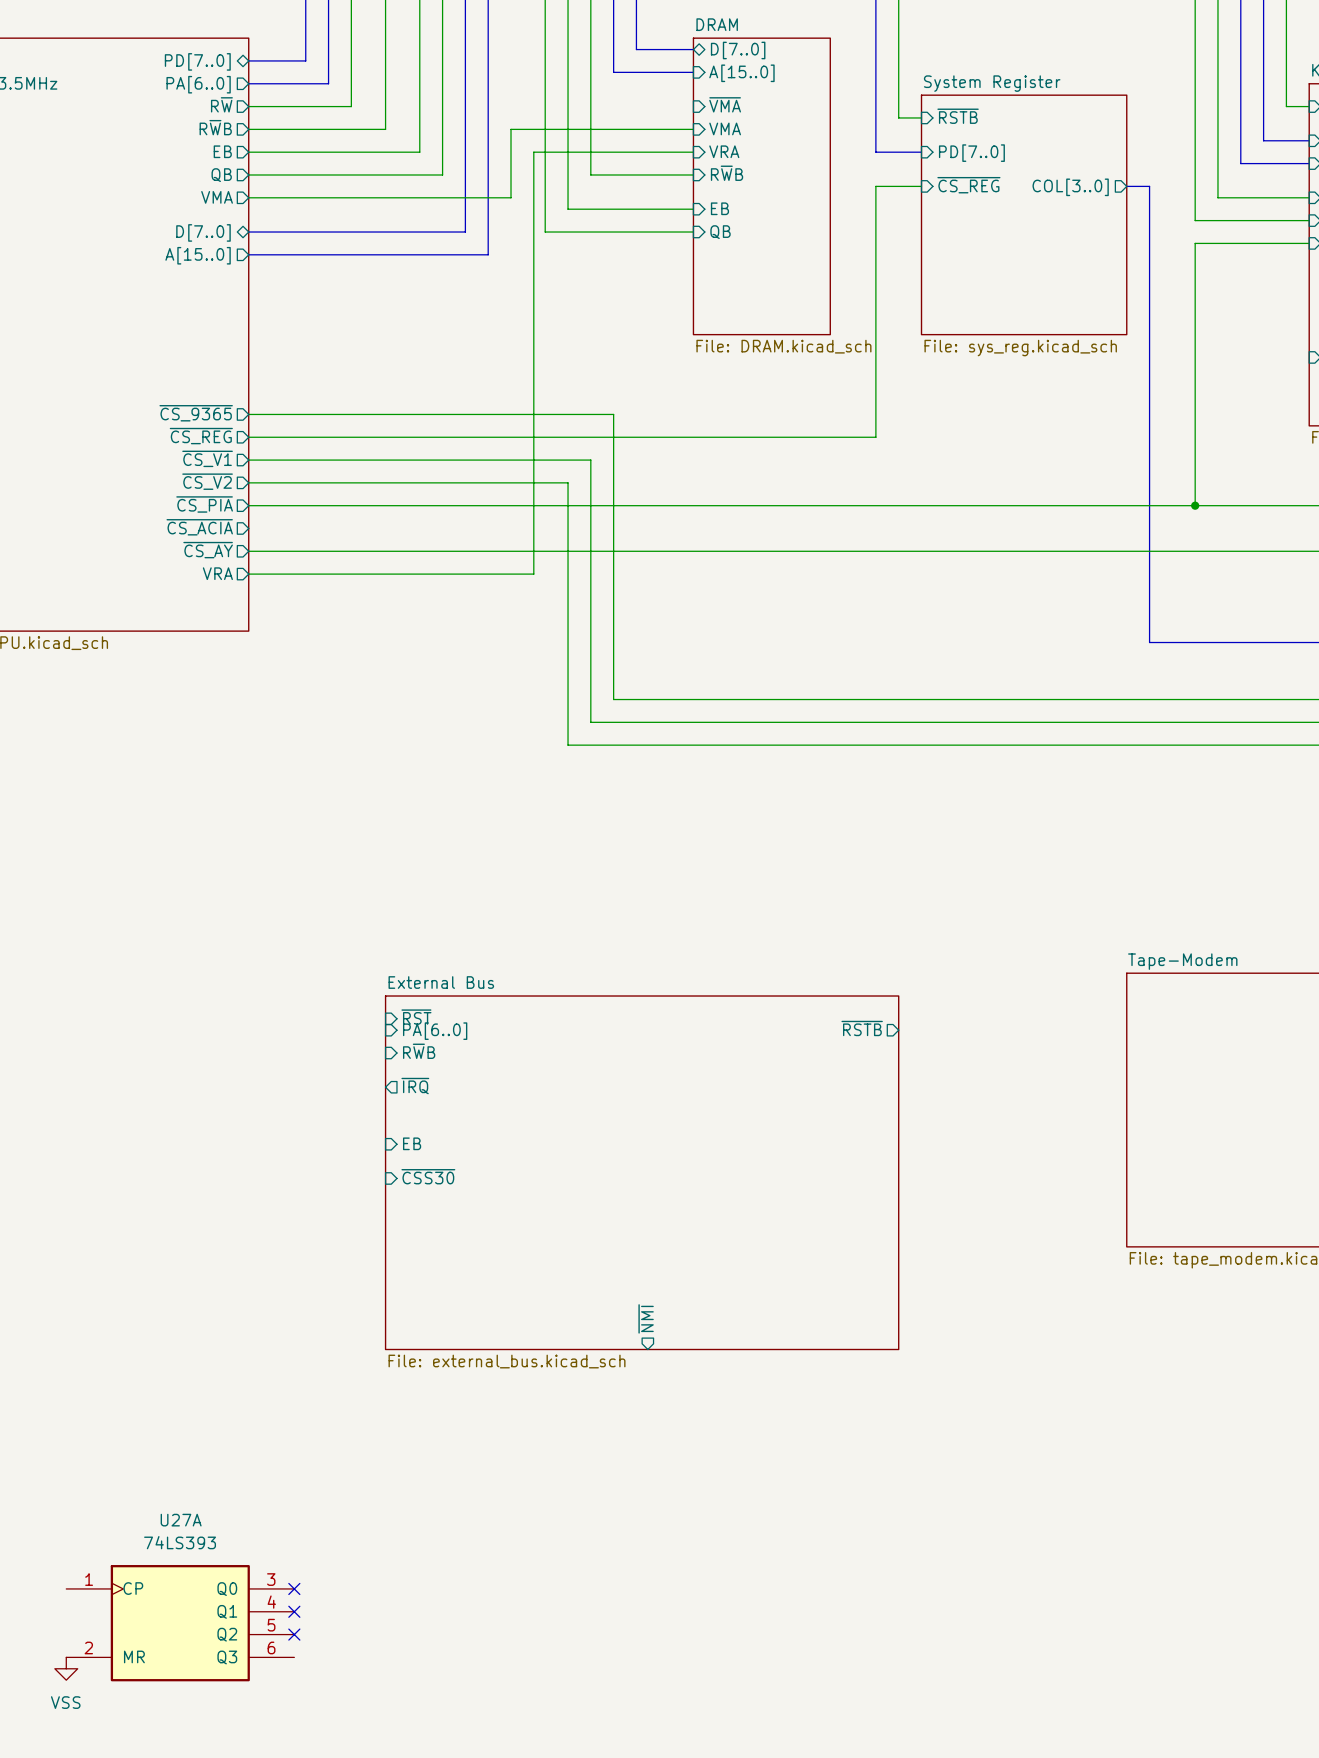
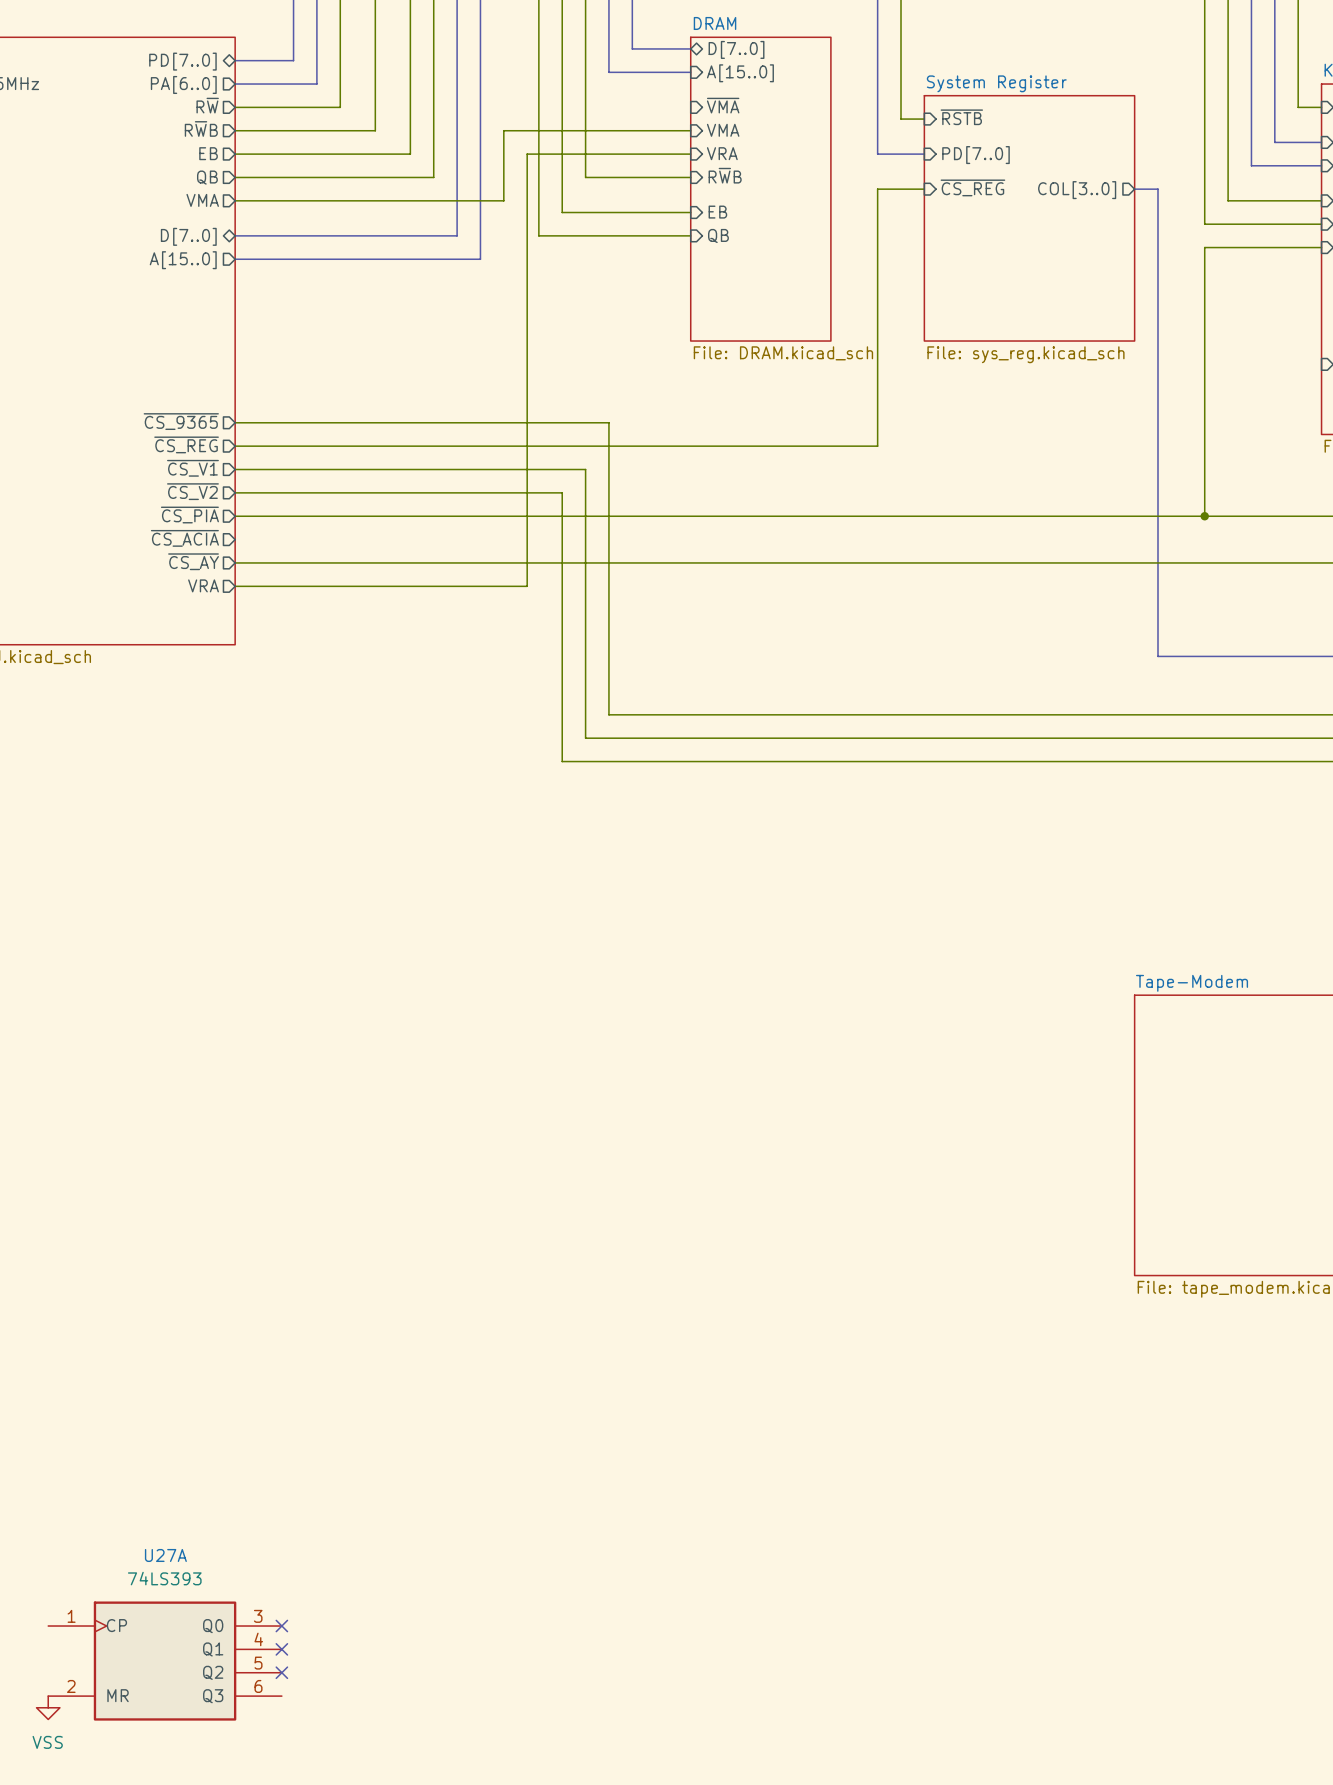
sheet pin: ~{RST} (416, 1017) -> none
sheet pin: ~{RSTB} (862, 1028) -> none
sheet pin: PA[6..0] (435, 1031) -> none
sheet pin: R~{W}B (419, 1051) -> none
sheet pin: ~{IRQ} (415, 1086) -> none
sheet pin: EB (412, 1143) -> none
sheet External Bus: File: external_bus.kicad_sch (642, 1172) -> none
sheet pin: ~{CSS30} (428, 1176) -> none
sheet pin: ~{NMI} (646, 1318) -> none

